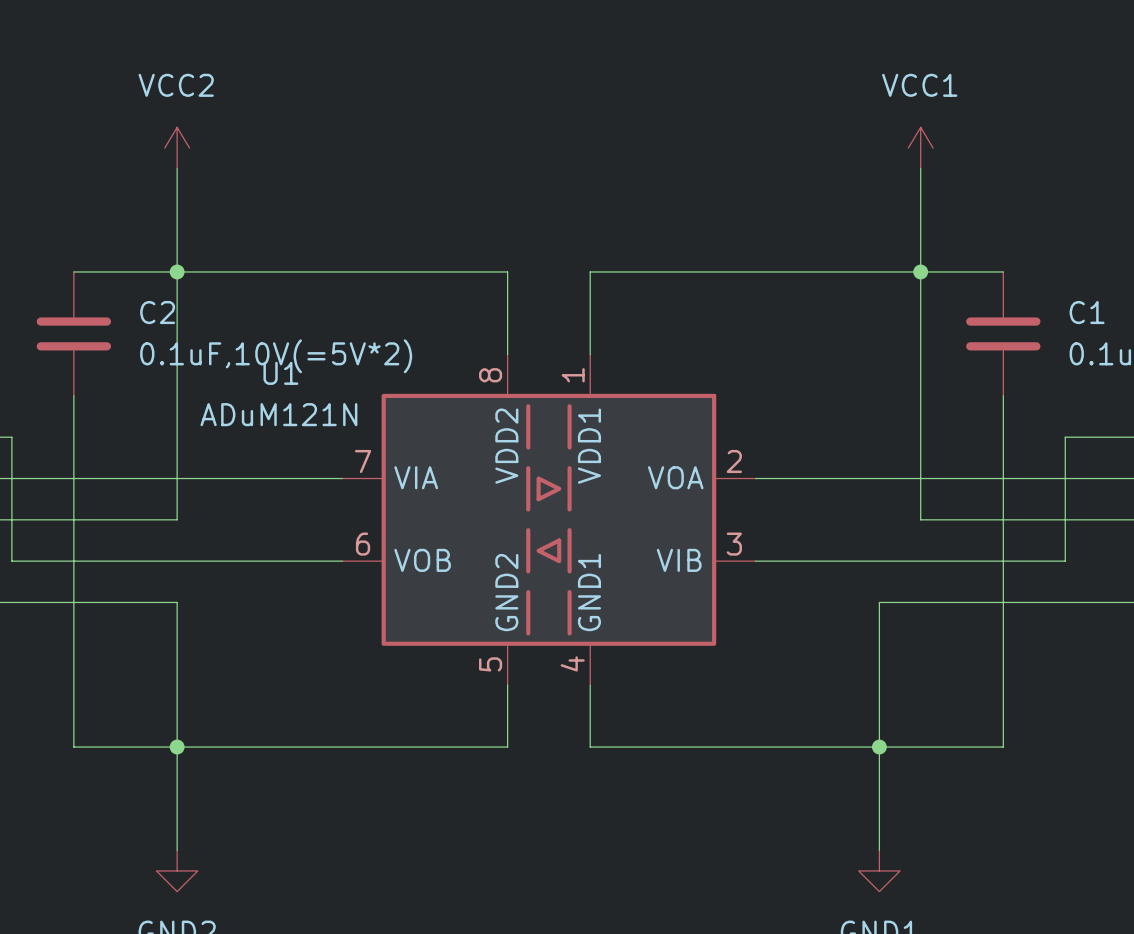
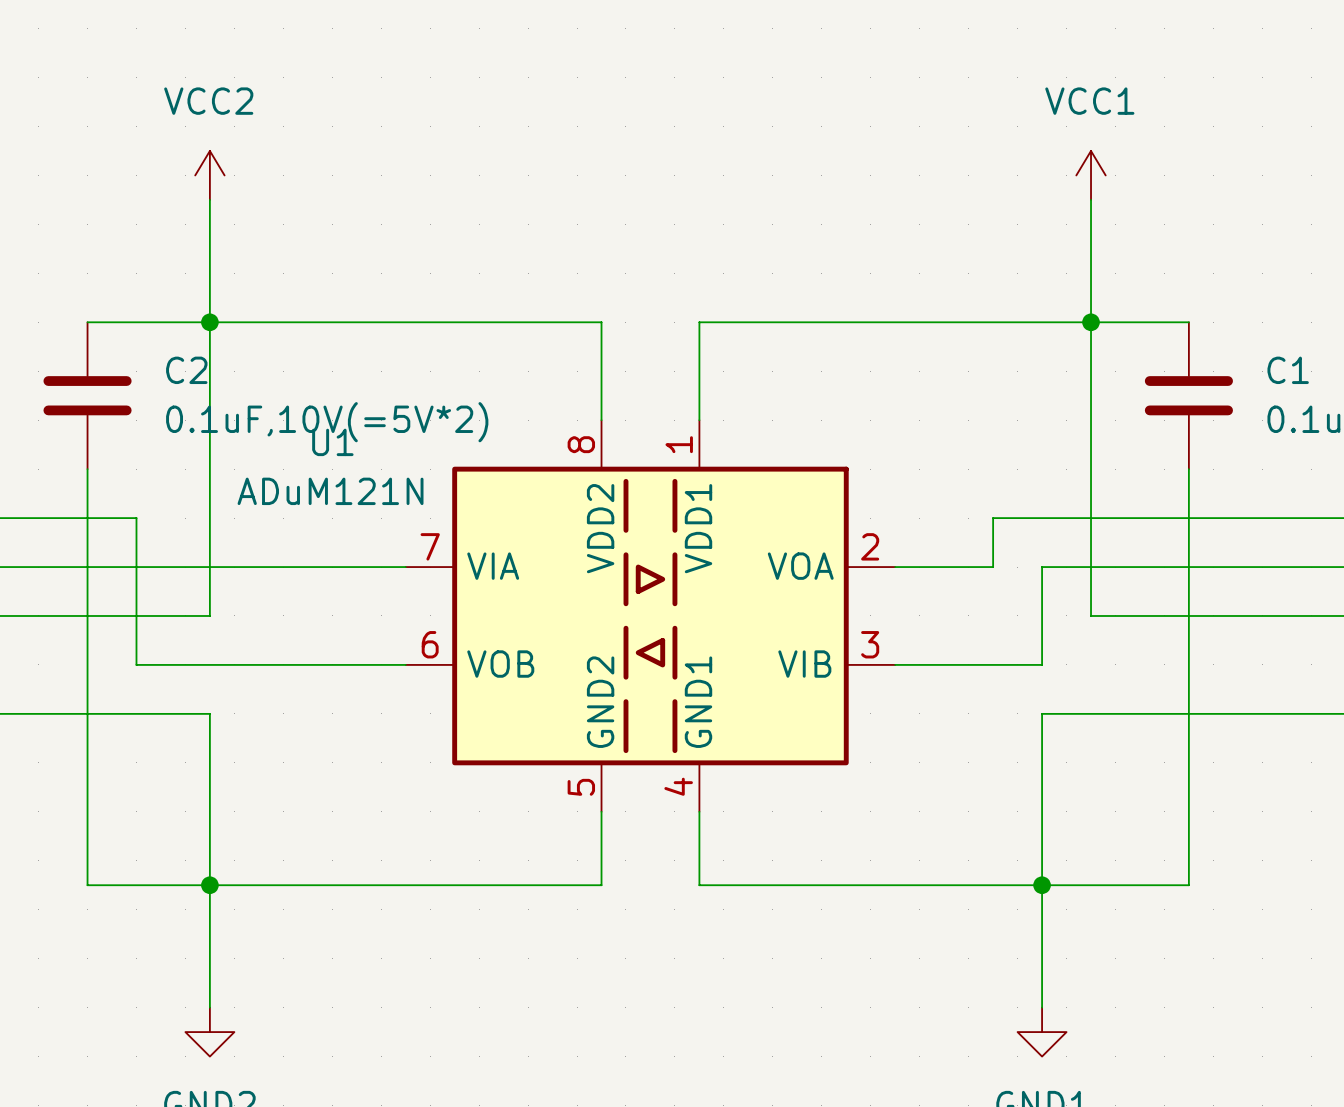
wire: (11, 437) (11, 561) (115, 561) -> (14, 518) (136, 518) (136, 664)
wire: (1065, 437) (1065, 561) (879, 561) -> (1262, 518) (993, 518) (993, 567)
wire: (838, 478) (879, 478) -> (1042, 664) (1042, 567)

